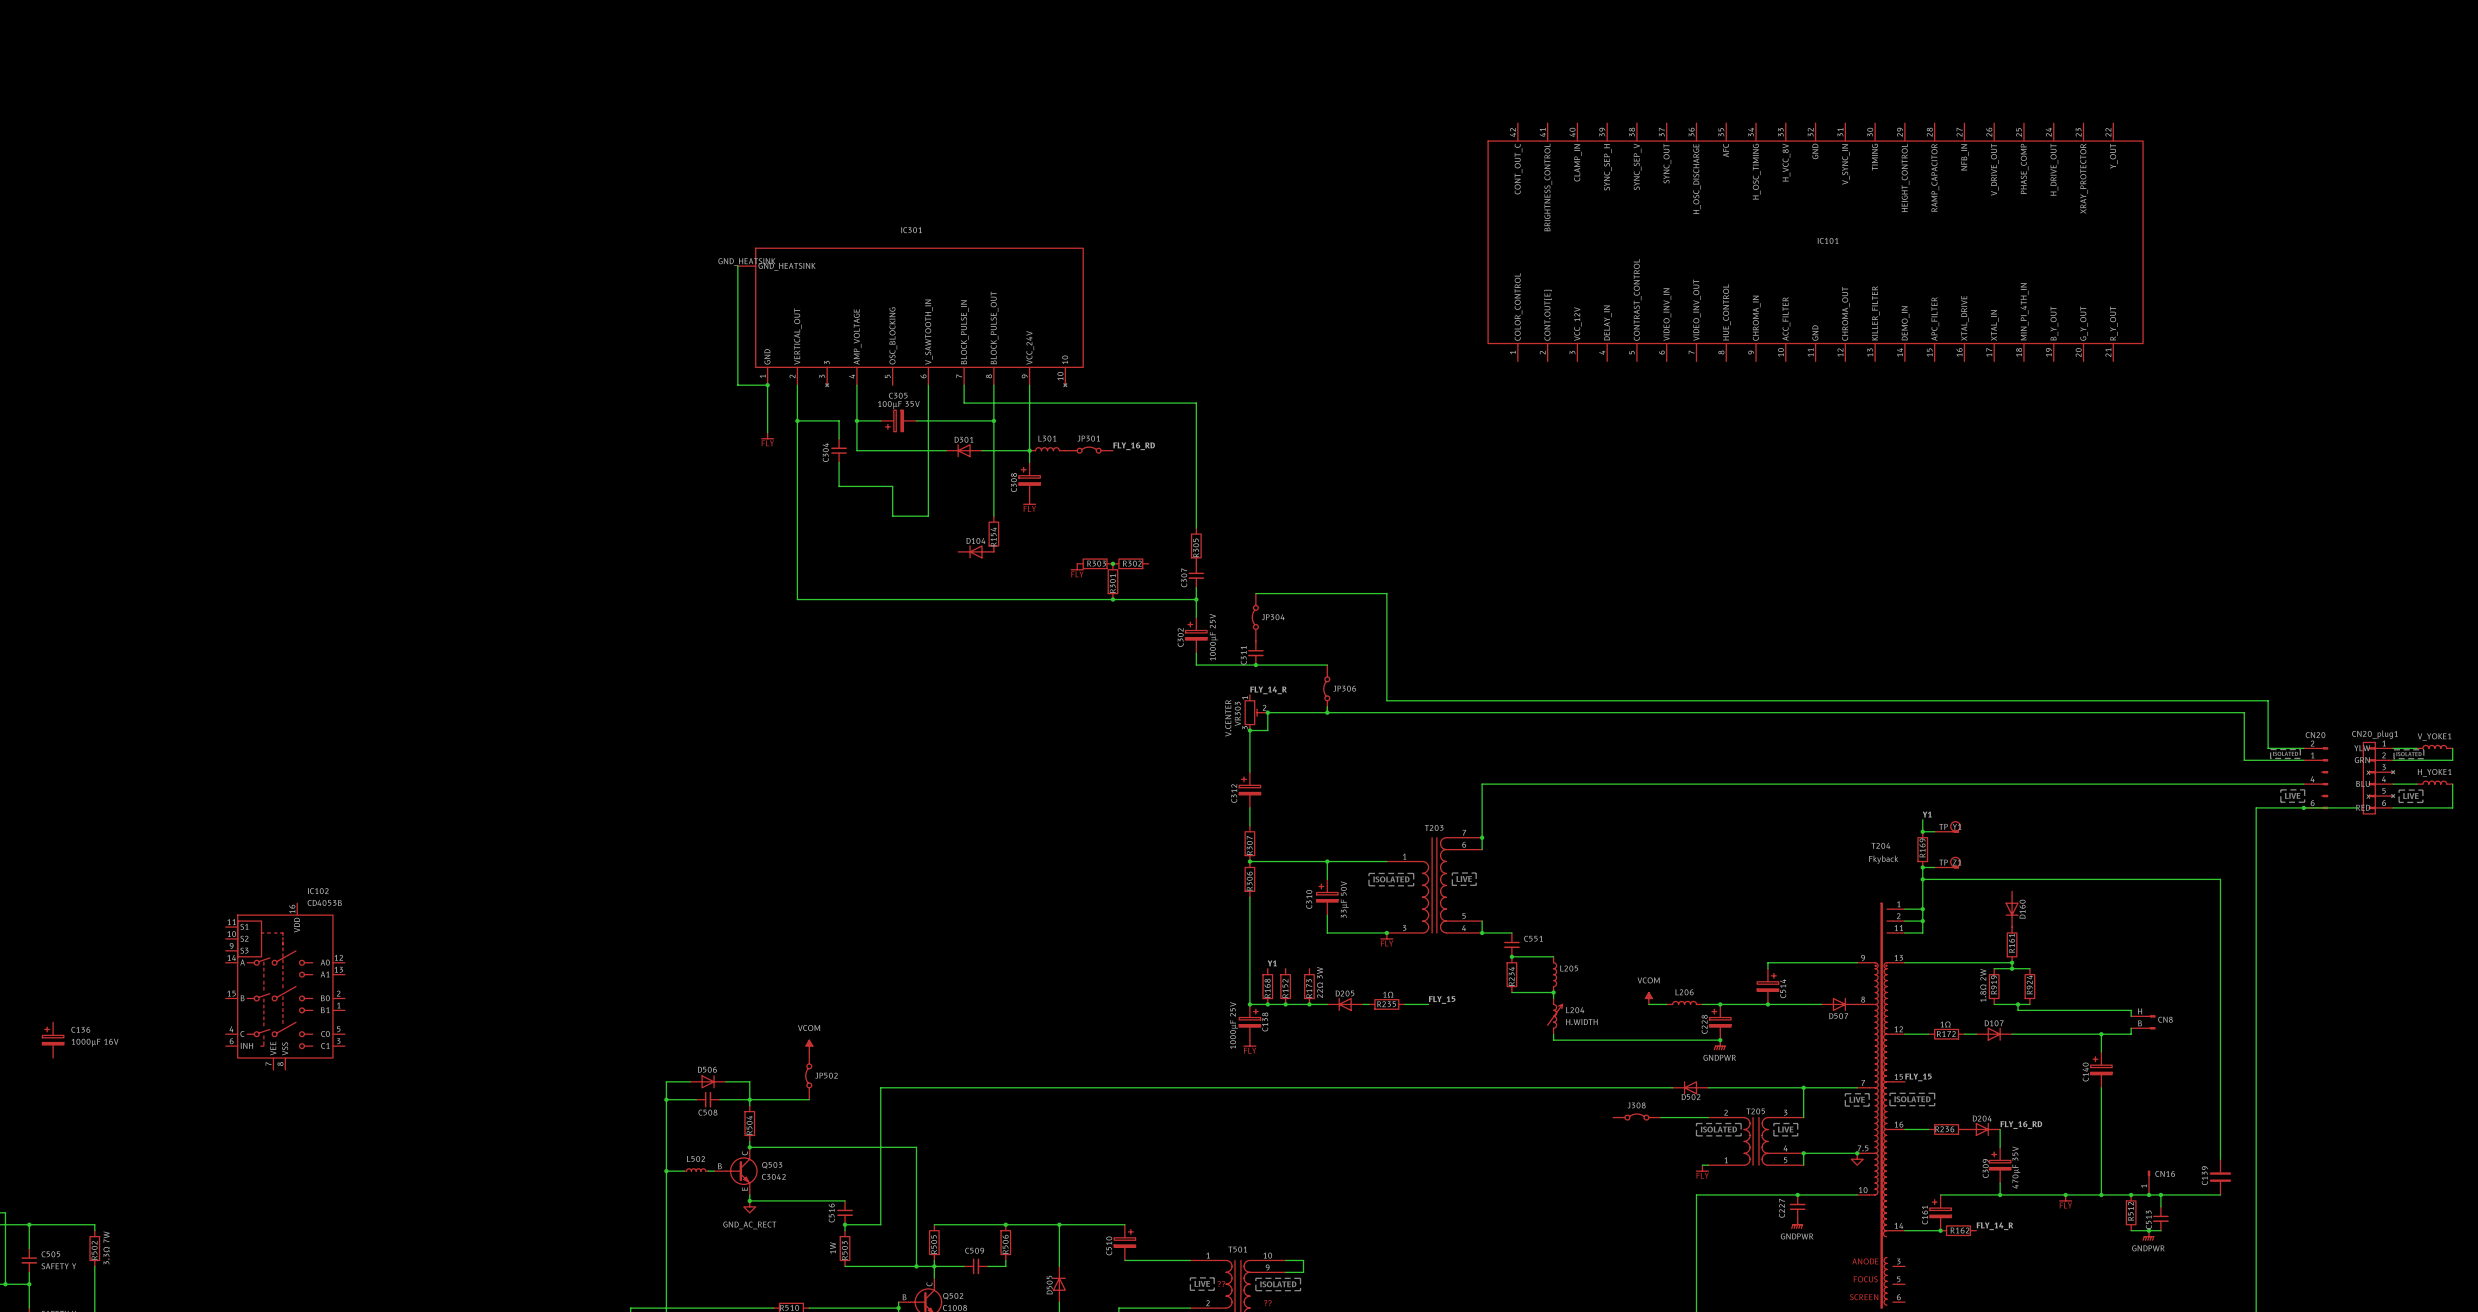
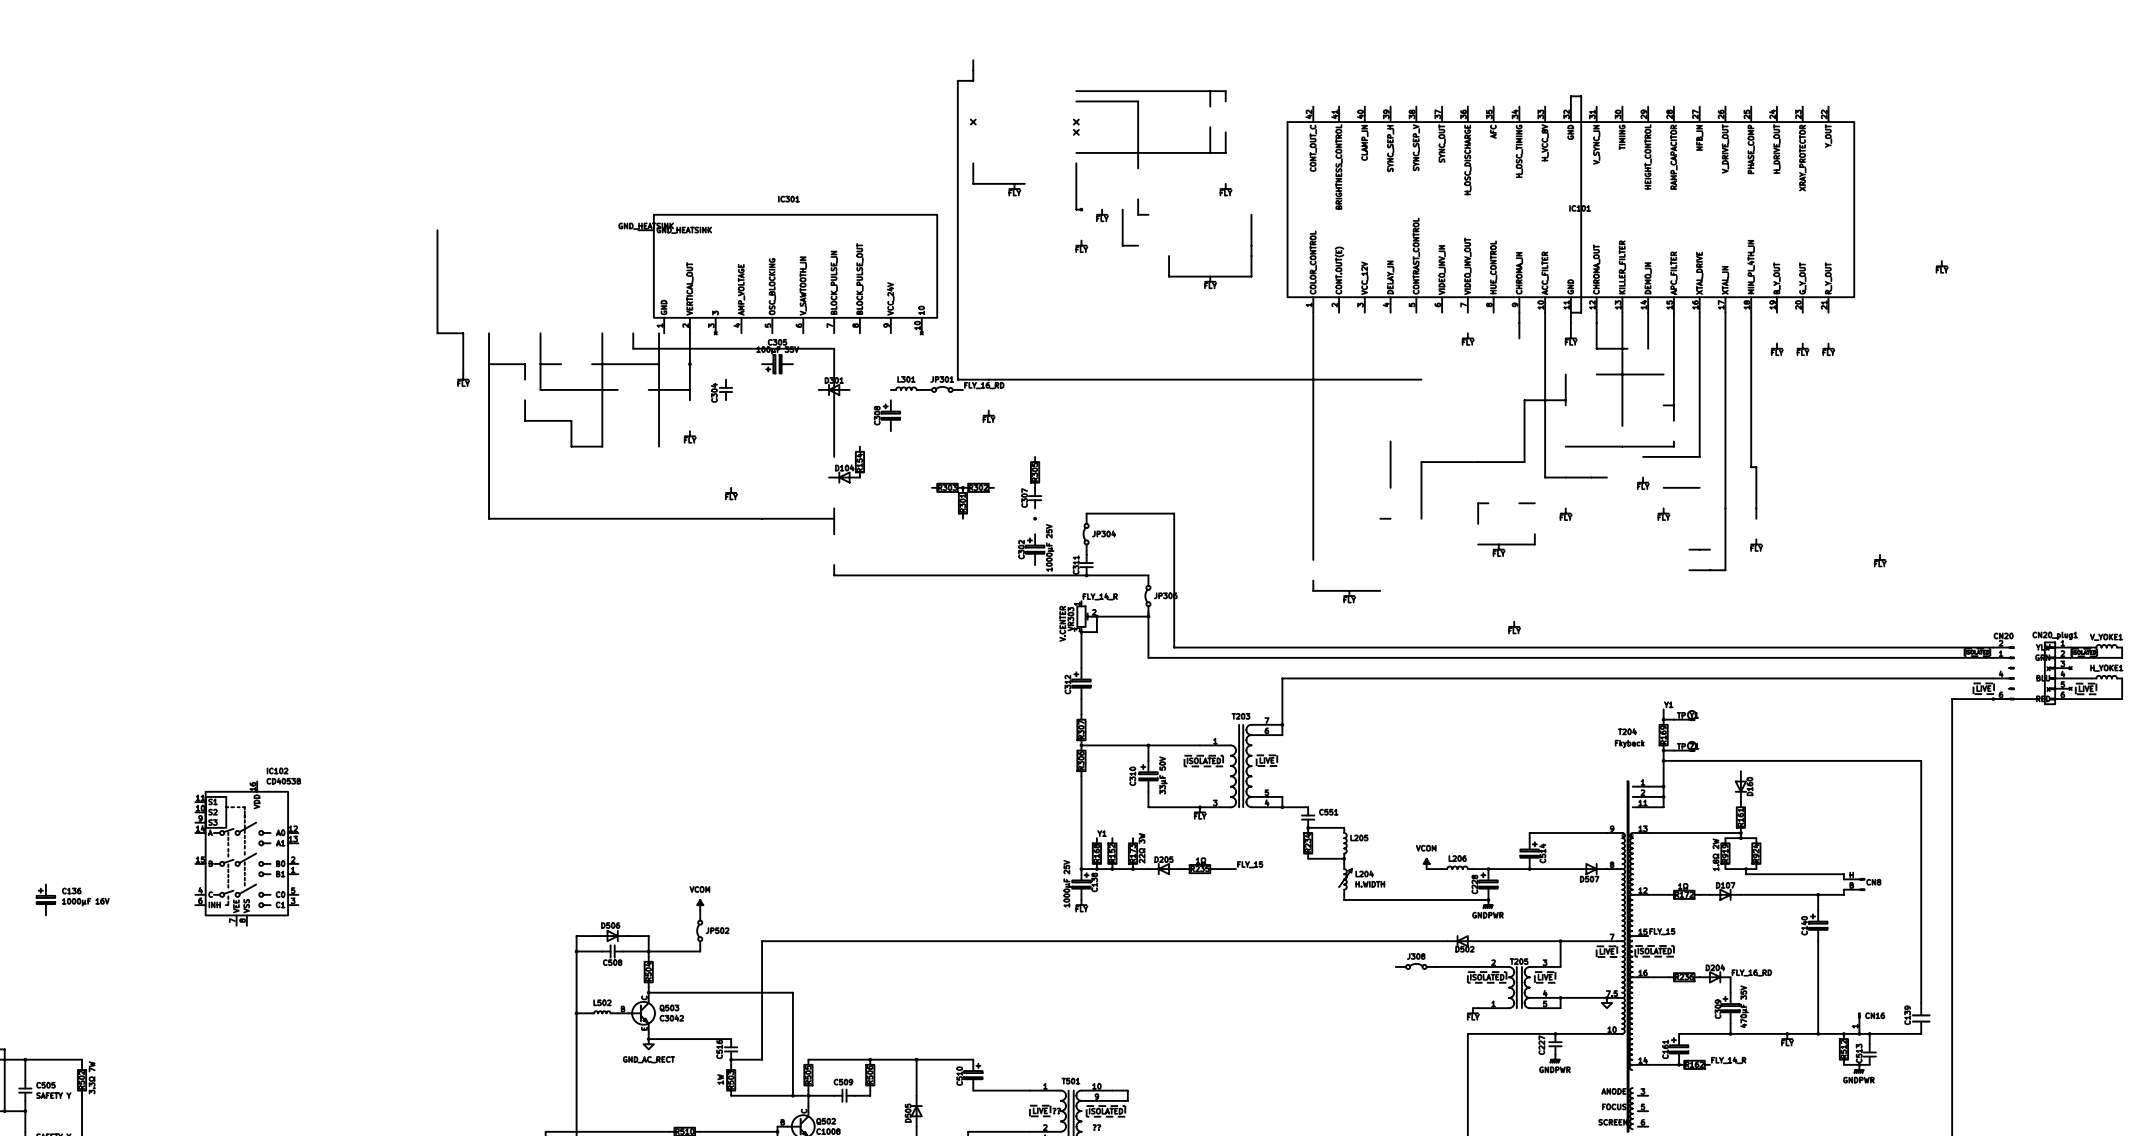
wire: none -> (973, 60) (973, 80) (957, 80) (957, 379) (1421, 379)
wire: none -> (1076, 91) (1225, 91) (1225, 101)
wire: none -> (1210, 91) (1210, 106)
wire: none -> (1076, 101) (1138, 101) (1138, 168)
wire: none -> (1570, 106) (1570, 96) (1581, 96) (1581, 312) (1570, 312) (1570, 333)
no-connect mark: none -> (973, 122)
no-connect mark: none -> (1076, 122)
wire: none -> (1210, 127) (1210, 152)
no-connect mark: none -> (1076, 132)
wire: none -> (1225, 132) (1225, 152) (1076, 152)
wire: none -> (973, 163) (973, 183) (1024, 183)
wire: none -> (1076, 163) (1076, 209) (1081, 209)
power symbol: none -> (1014, 186)
power symbol: none -> (1225, 186)
wire: none -> (1138, 199) (1138, 214) (1148, 214)
junction: none -> (1081, 209)
wire: none -> (1122, 209) (1122, 245) (1138, 245)
power symbol: none -> (1102, 212)
wire: none -> (1251, 214) (1251, 276) (1169, 276) (1169, 256)
wire: none -> (437, 230) (437, 333) (463, 333) (463, 374)
wire: (737, 266) (737, 385) (767, 385) (767, 432) -> none
power symbol: none -> (1081, 243)
power symbol: none -> (1941, 263)
power symbol: none -> (1210, 279)
wire: none -> (1313, 312) (1313, 559)
wire: none -> (1519, 312) (1519, 338)
wire: none -> (1545, 312) (1545, 477) (1606, 477)
wire: none -> (1596, 312) (1596, 348) (1627, 348)
wire: none -> (1622, 312) (1622, 426)
wire: none -> (1648, 312) (1648, 348)
wire: none -> (1673, 312) (1673, 420)
wire: none -> (1699, 312) (1699, 456) (1643, 456)
wire: none -> (1725, 312) (1725, 570) (1689, 570)
wire: none -> (1751, 312) (1751, 467) (1756, 467) (1756, 518)
wire: none -> (540, 333) (540, 389) (617, 389)
wire: none -> (602, 333) (602, 446) (571, 446) (571, 420) (525, 420) (525, 400)
wire: none -> (633, 333) (633, 348) (834, 348) (834, 456)
wire: none -> (659, 333) (659, 446)
junction: (767, 385) -> none
wire: (856, 385) (856, 450) (946, 450) -> none
wire: (928, 385) (928, 516) (892, 516) (892, 486) (839, 486) (839, 462) -> none
wire: (964, 385) (964, 403) (1196, 403) (1196, 528) -> none
wire: (993, 385) (993, 516) -> none
wire: (1029, 385) (1029, 462) -> none
power symbol: none -> (1467, 335)
power symbol: none -> (1570, 335)
power symbol: none -> (1776, 346)
power symbol: none -> (1802, 346)
power symbol: none -> (1828, 346)
wire: none -> (489, 364) (525, 364) (525, 379)
wire: none -> (540, 364) (561, 364)
wire: none -> (592, 364) (659, 364)
wire: (797, 420) (839, 420) (839, 438) -> none
wire: (856, 420) (880, 420) -> none
junction: (856, 420) -> none
wire: (916, 420) (993, 420) -> none
junction: (993, 420) -> none
wire: none -> (1565, 374) (1565, 405)
wire: none -> (1596, 374) (1663, 374)
power symbol: none -> (463, 377)
power symbol position: (767, 435) -> (689, 433)
wire: none -> (648, 389) (689, 389)
wire: (981, 450) (1029, 450) -> none
junction: (1029, 450) -> none
wire: (797, 462) (797, 599) -> (489, 333) (489, 518) (689, 518)
wire: none -> (1565, 400) (1524, 400) (1524, 462) (1421, 462) (1421, 518)
wire: none -> (1663, 405) (1673, 405)
power symbol: none -> (988, 413)
power symbol: (1029, 501) -> none
wire: none -> (1390, 441) (1390, 487)
wire: none -> (1673, 441) (1673, 446) (1565, 446)
power symbol: none -> (1643, 480)
wire: none -> (1663, 487) (1699, 487)
power symbol: none -> (731, 490)
power symbol: (1077, 566) -> none
wire: none -> (1488, 503) (1478, 503) (1478, 523)
wire: none -> (1519, 503) (1534, 503)
wire: none -> (834, 508) (834, 534)
wire: (1196, 587) (1196, 617) -> none
power symbol: none -> (1565, 511)
power symbol: none -> (1663, 511)
wire: (1357, 593) (1386, 593) (1386, 700) (2268, 700) (2268, 748) -> (1174, 513) (1174, 647) (1962, 647)
wire: (964, 599) (1196, 599) -> none
junction: (1112, 599) -> none
wire: none -> (1380, 518) (1390, 518)
wire: none -> (1534, 534) (1534, 544) (1478, 544)
power symbol: none -> (1756, 541)
power symbol: none -> (1498, 547)
wire: none -> (1689, 549) (1709, 549)
power symbol: none -> (1880, 557)
wire: (1196, 653) (1196, 665) -> (834, 565) (834, 575) (1035, 575)
wire: none -> (1313, 580) (1313, 590) (1380, 590)
power symbol: none -> (1349, 593)
wire: (1327, 712) (2244, 712) (2244, 760) -> (1148, 616) (1148, 657) (1941, 657)
power symbol: none -> (1514, 624)

